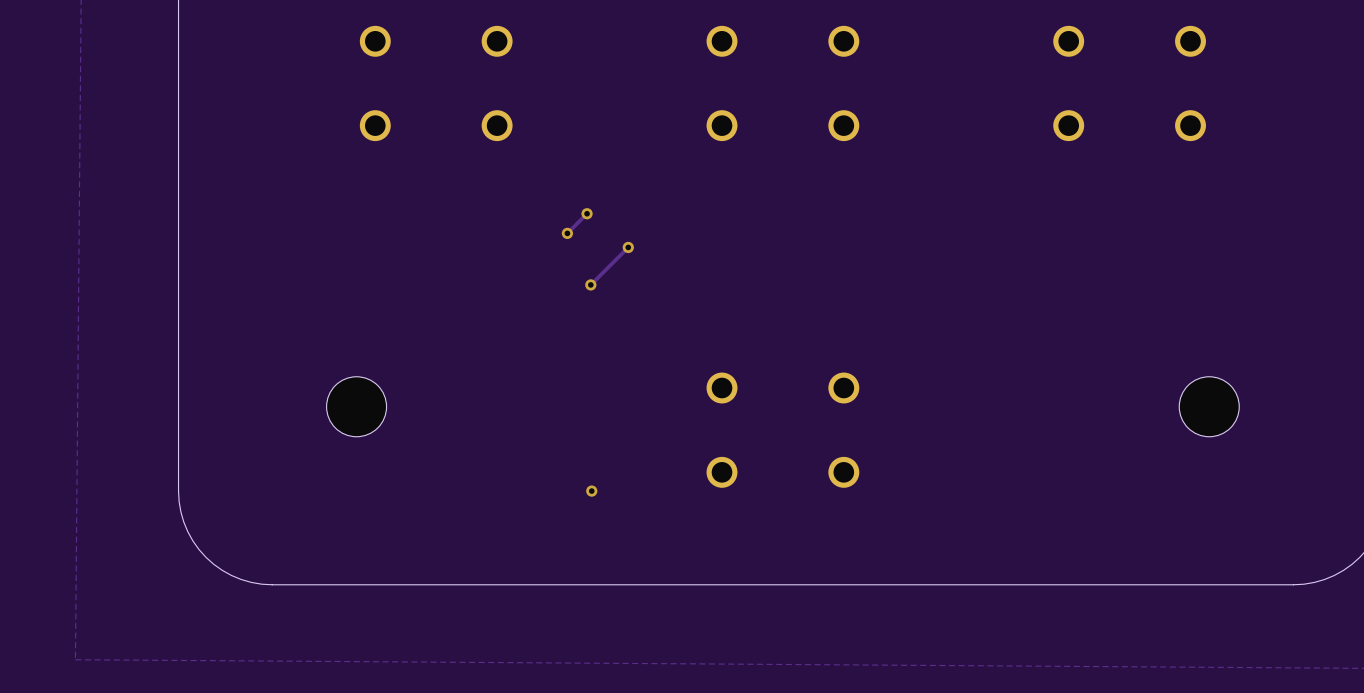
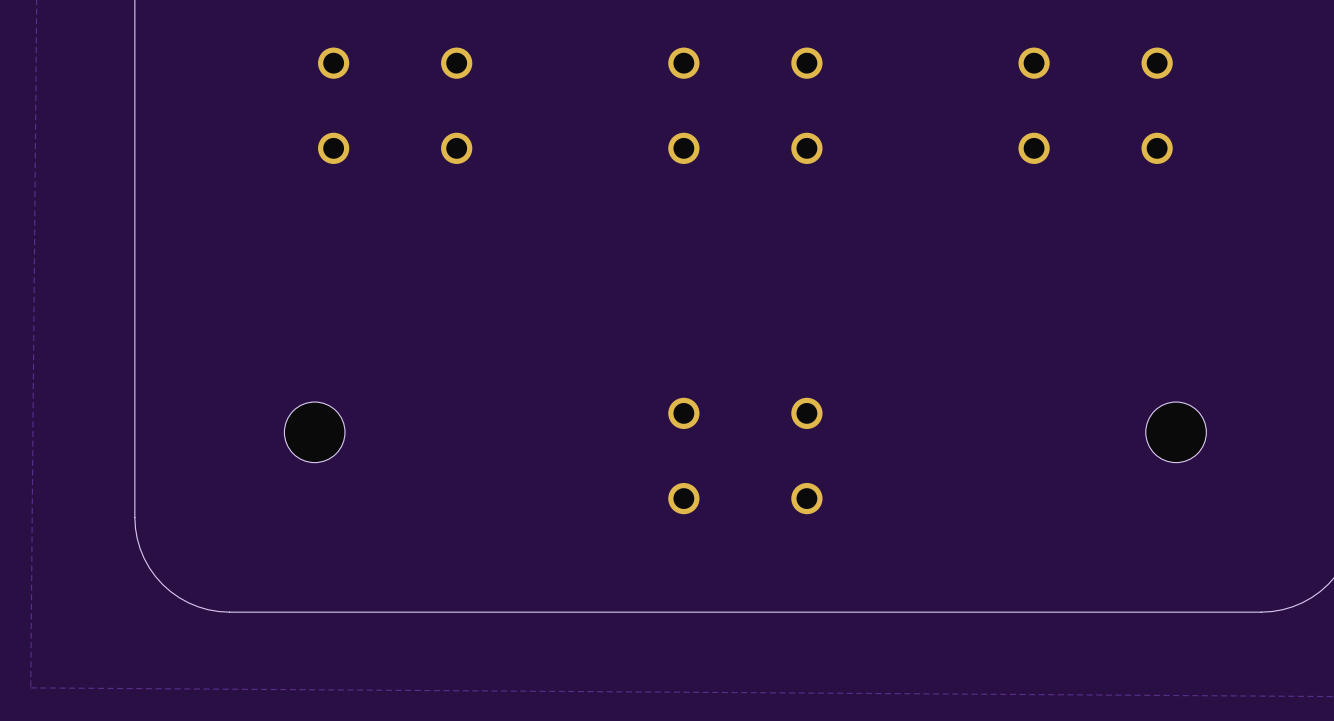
track: (587, 213) (567, 233) -> none
via: (587, 213) -> none
via: (567, 233) -> none
track: (628, 247) (590, 284) -> none
via: (628, 247) -> none
via: (590, 284) -> none
via: (591, 491) -> none

